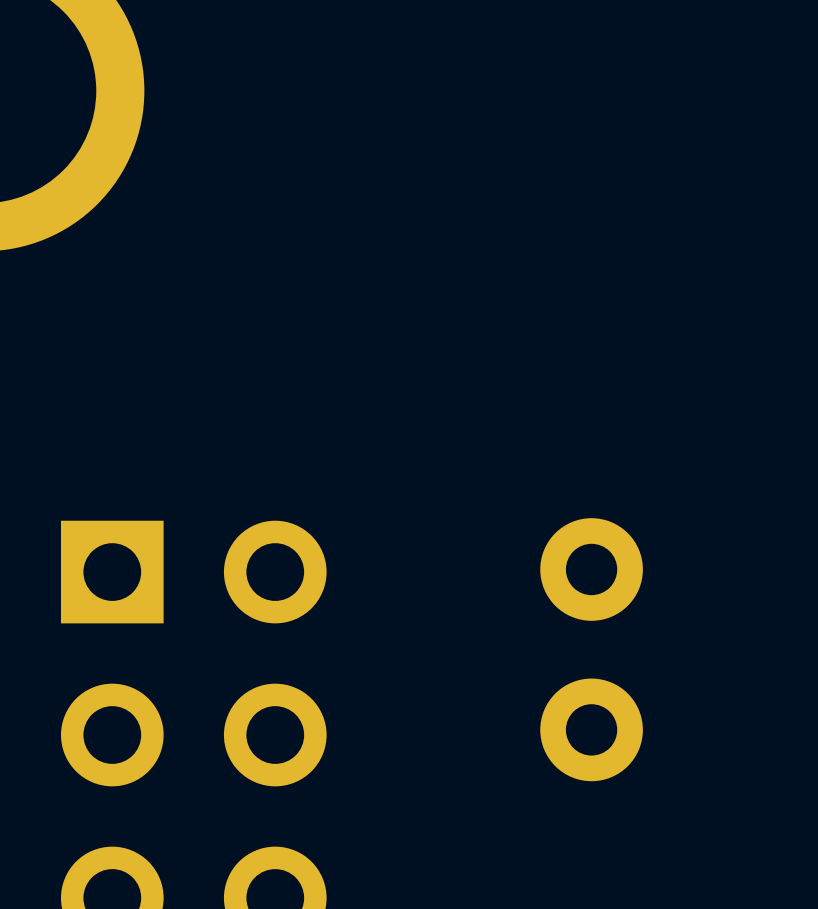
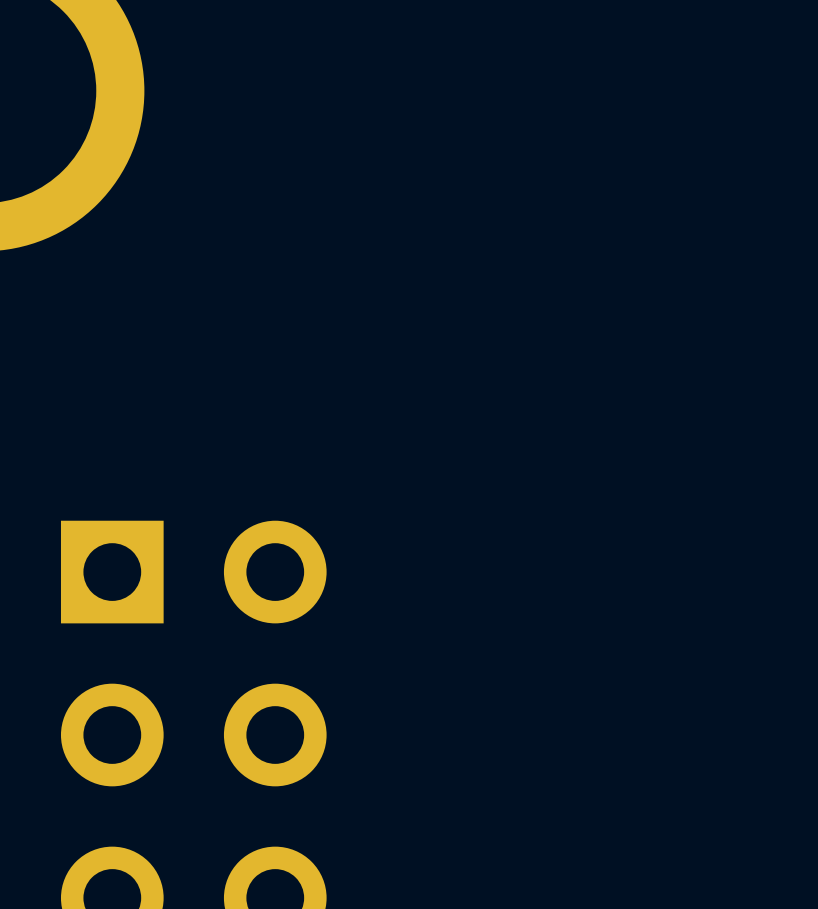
part: (591, 649) -> none

